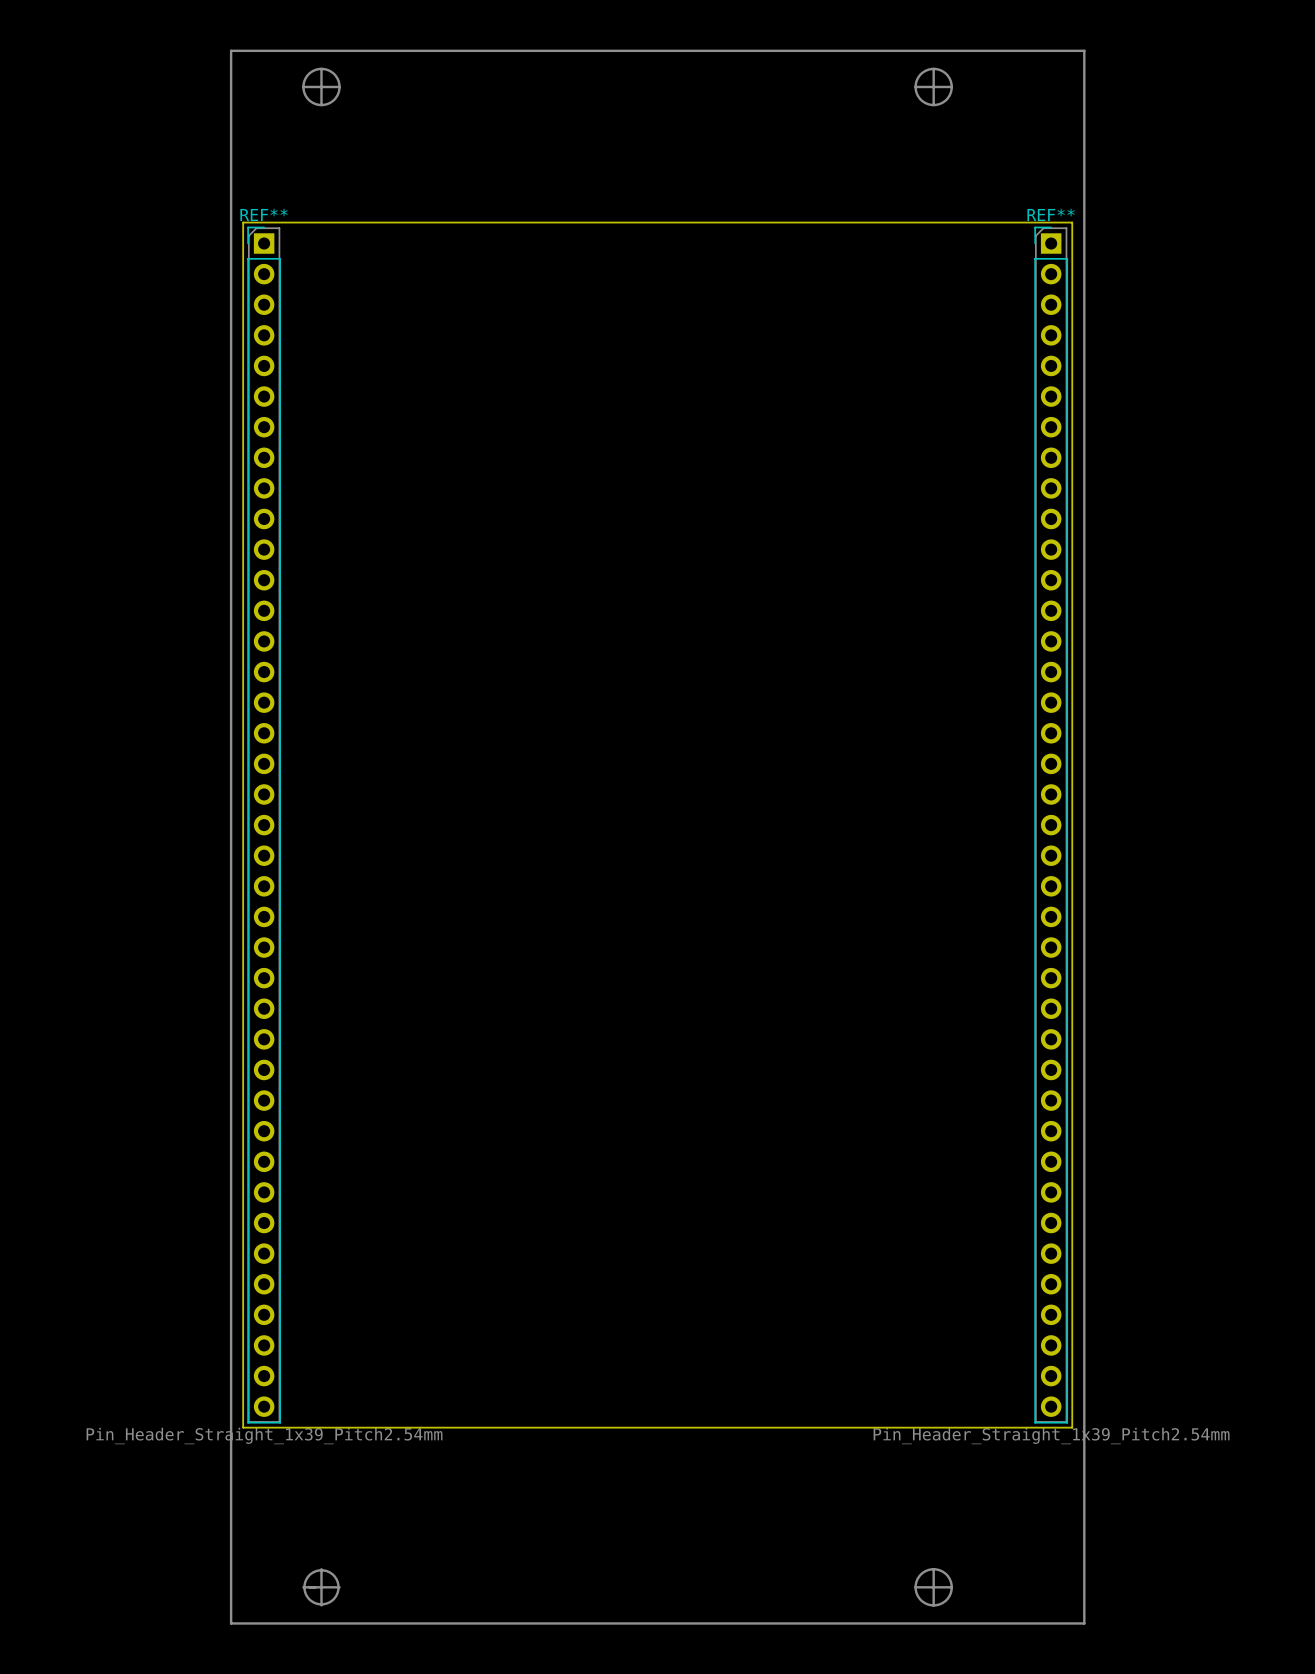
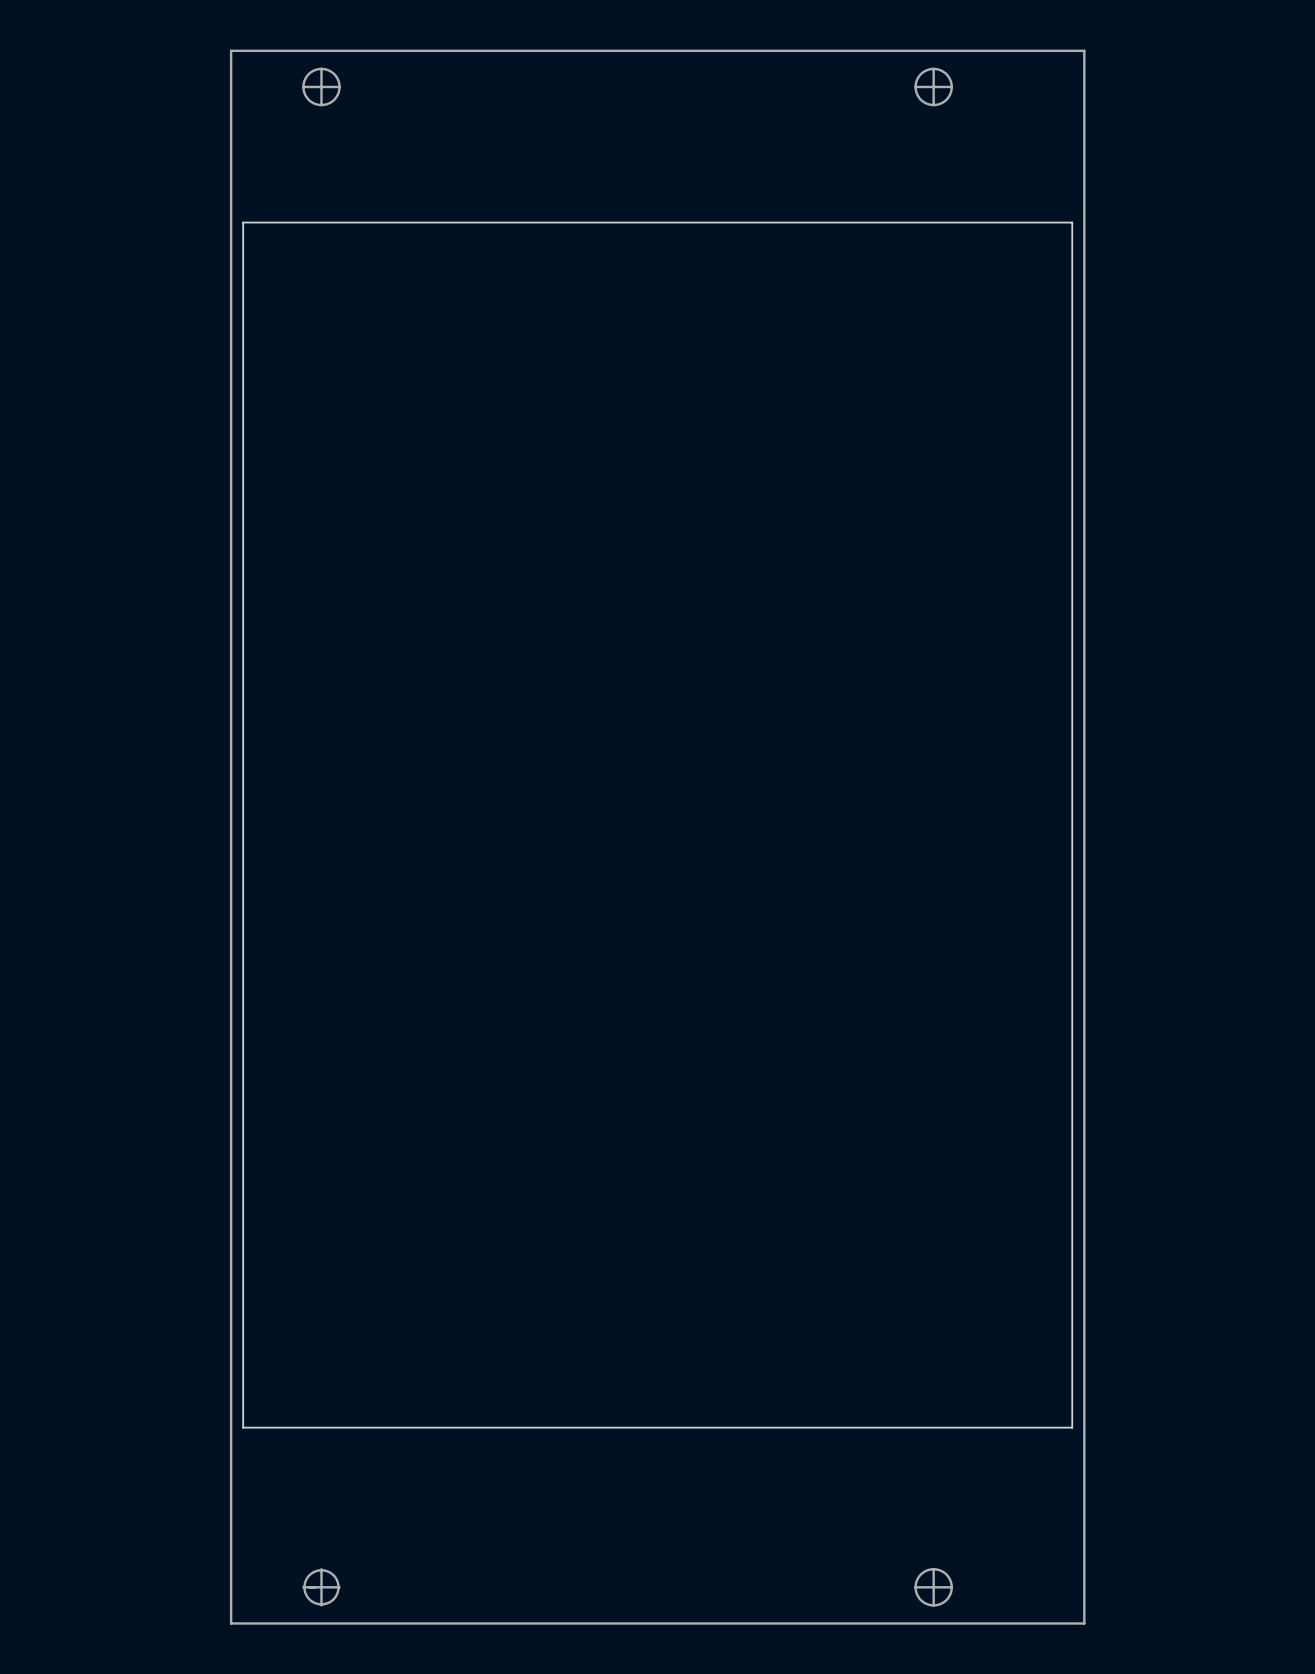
REF**: Pin_Header_Straight_1x39_Pitch2.54mm (264, 825) -> none
REF**: Pin_Header_Straight_1x39_Pitch2.54mm (1051, 825) -> none

